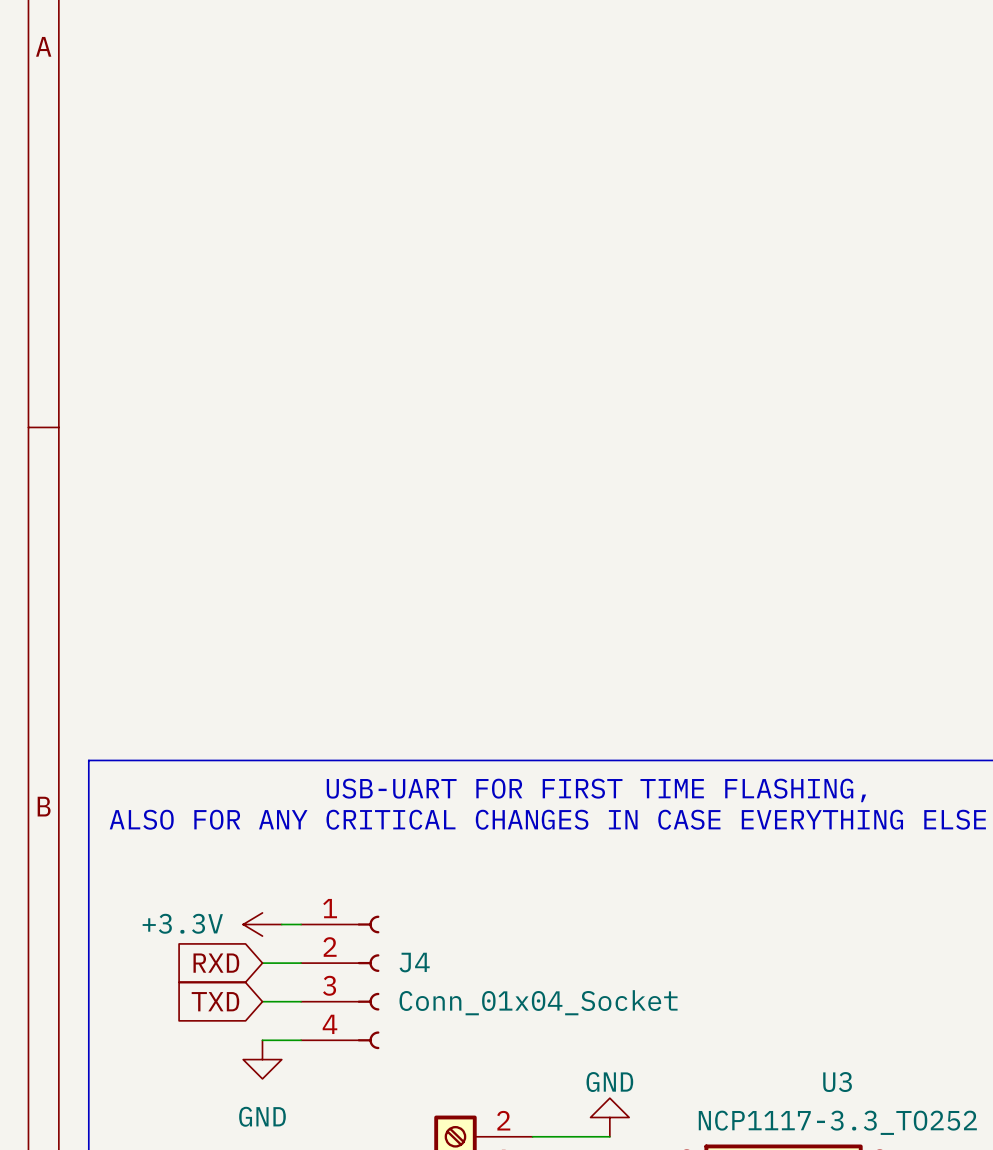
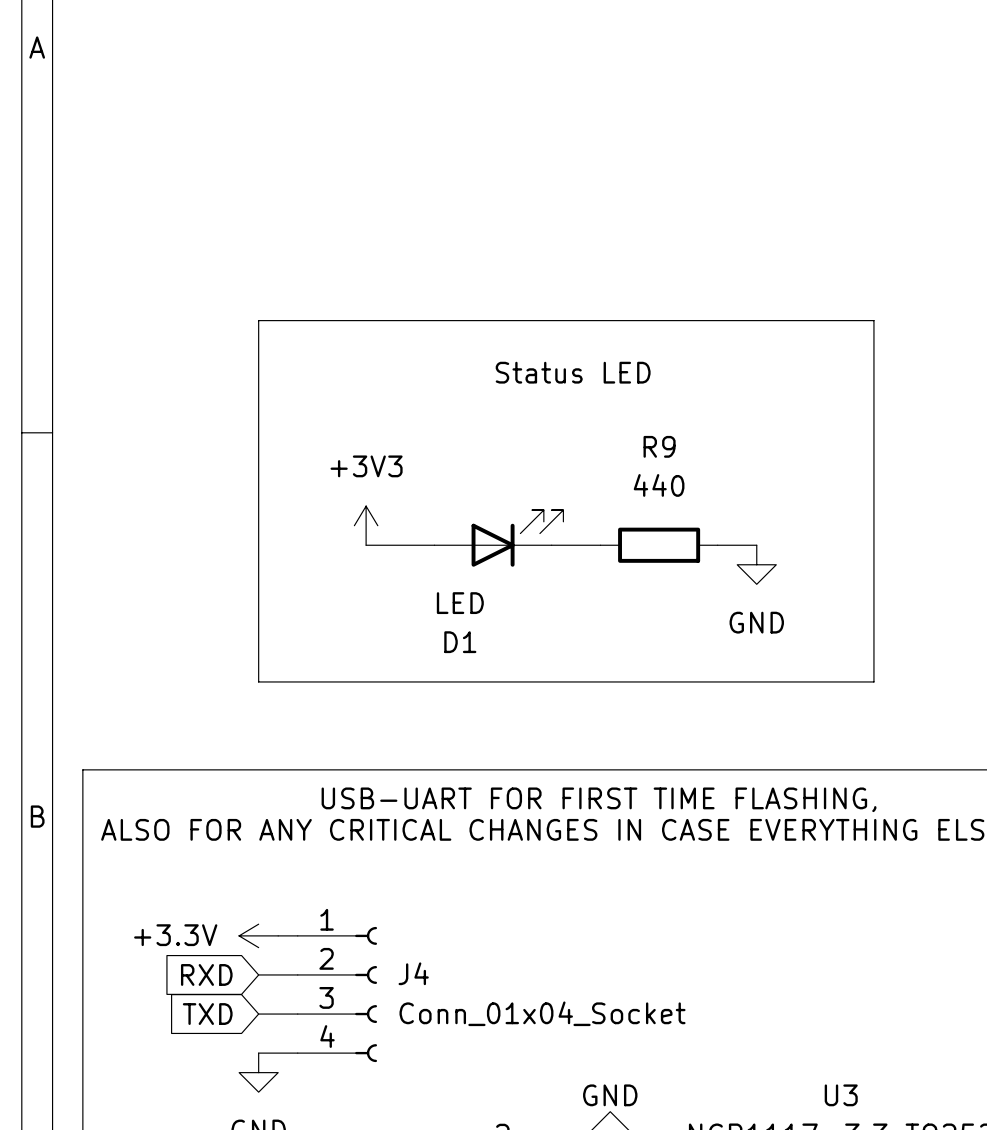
line: none -> (258, 320) (873, 320) (873, 681) (258, 681) (258, 320)
text: none -> Status LED (573, 372)
power symbol: none -> +3V3 (366, 525)
D1: none -> LED (498, 538)
wire: none -> (366, 545) (434, 545)
wire: none -> (551, 545) (600, 545)
R9: none -> 440 (659, 545)
wire: none -> (717, 545) (756, 545)
power symbol: none -> GND (756, 564)

